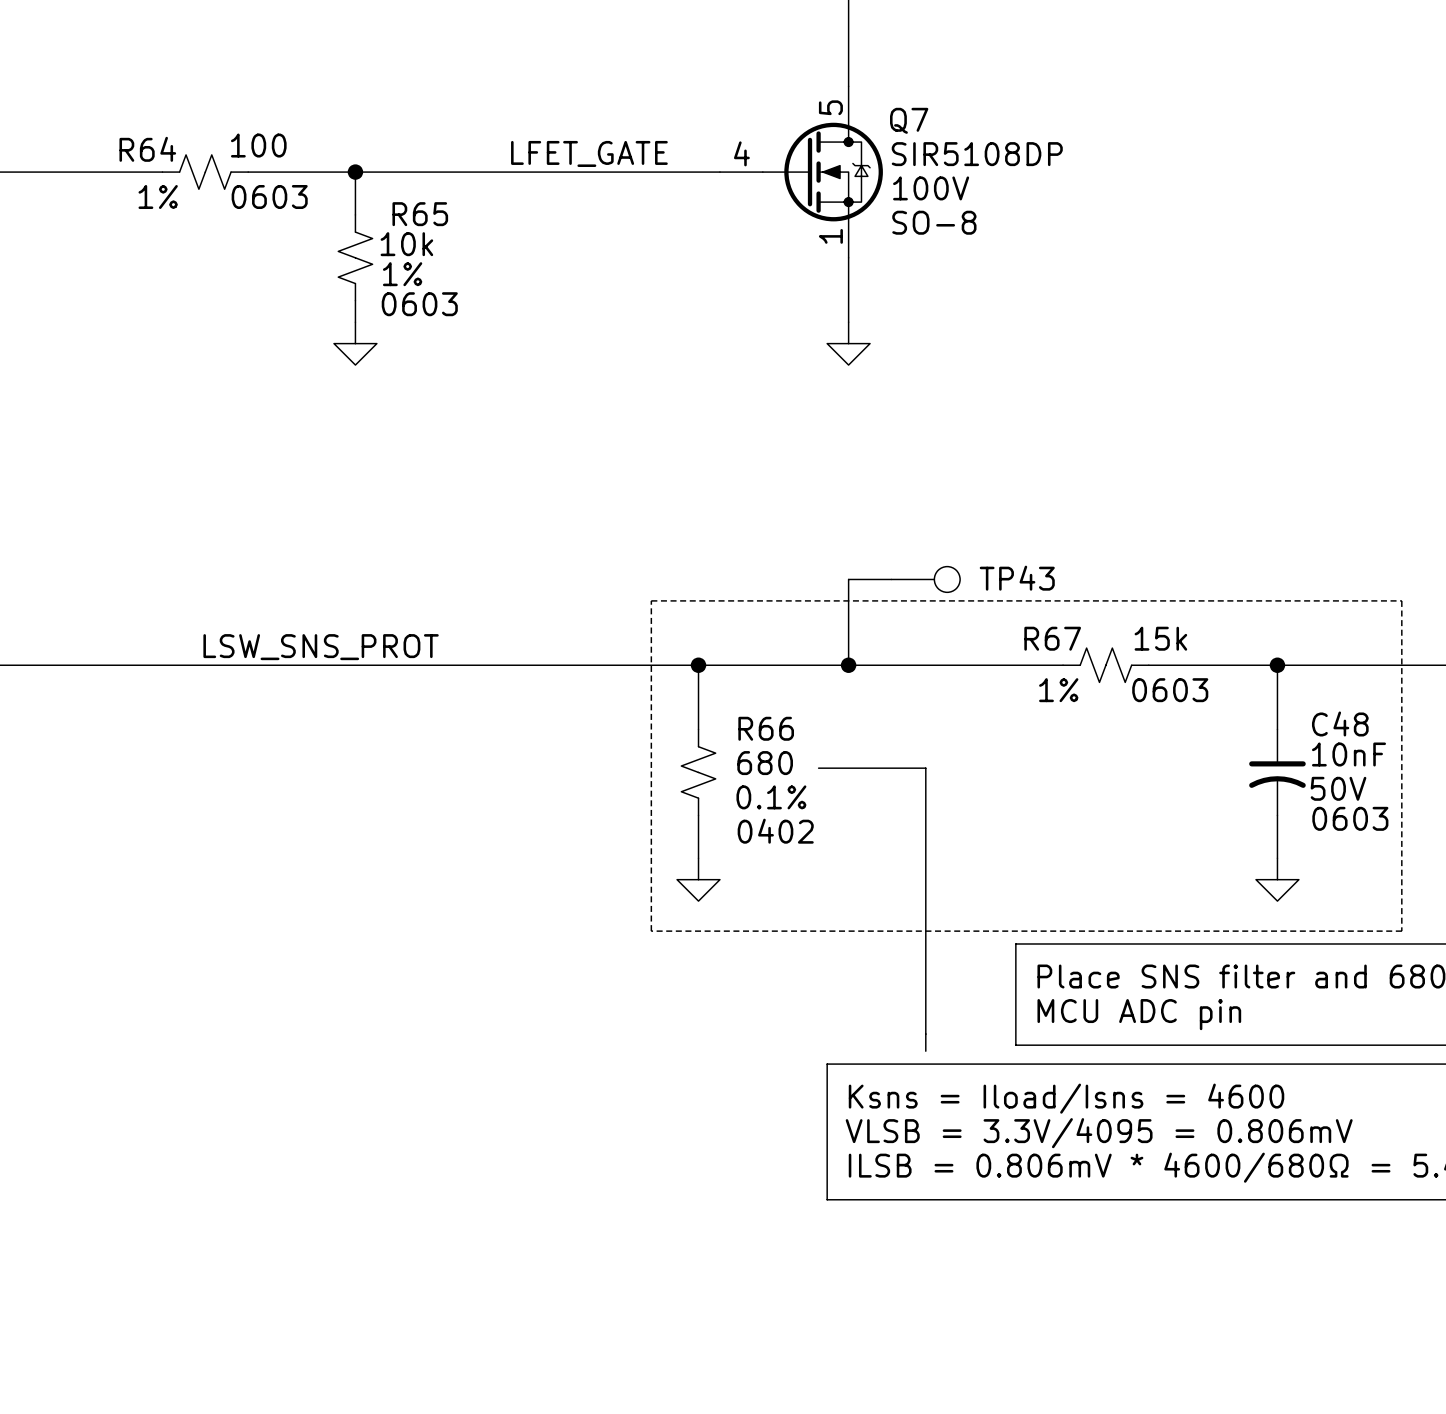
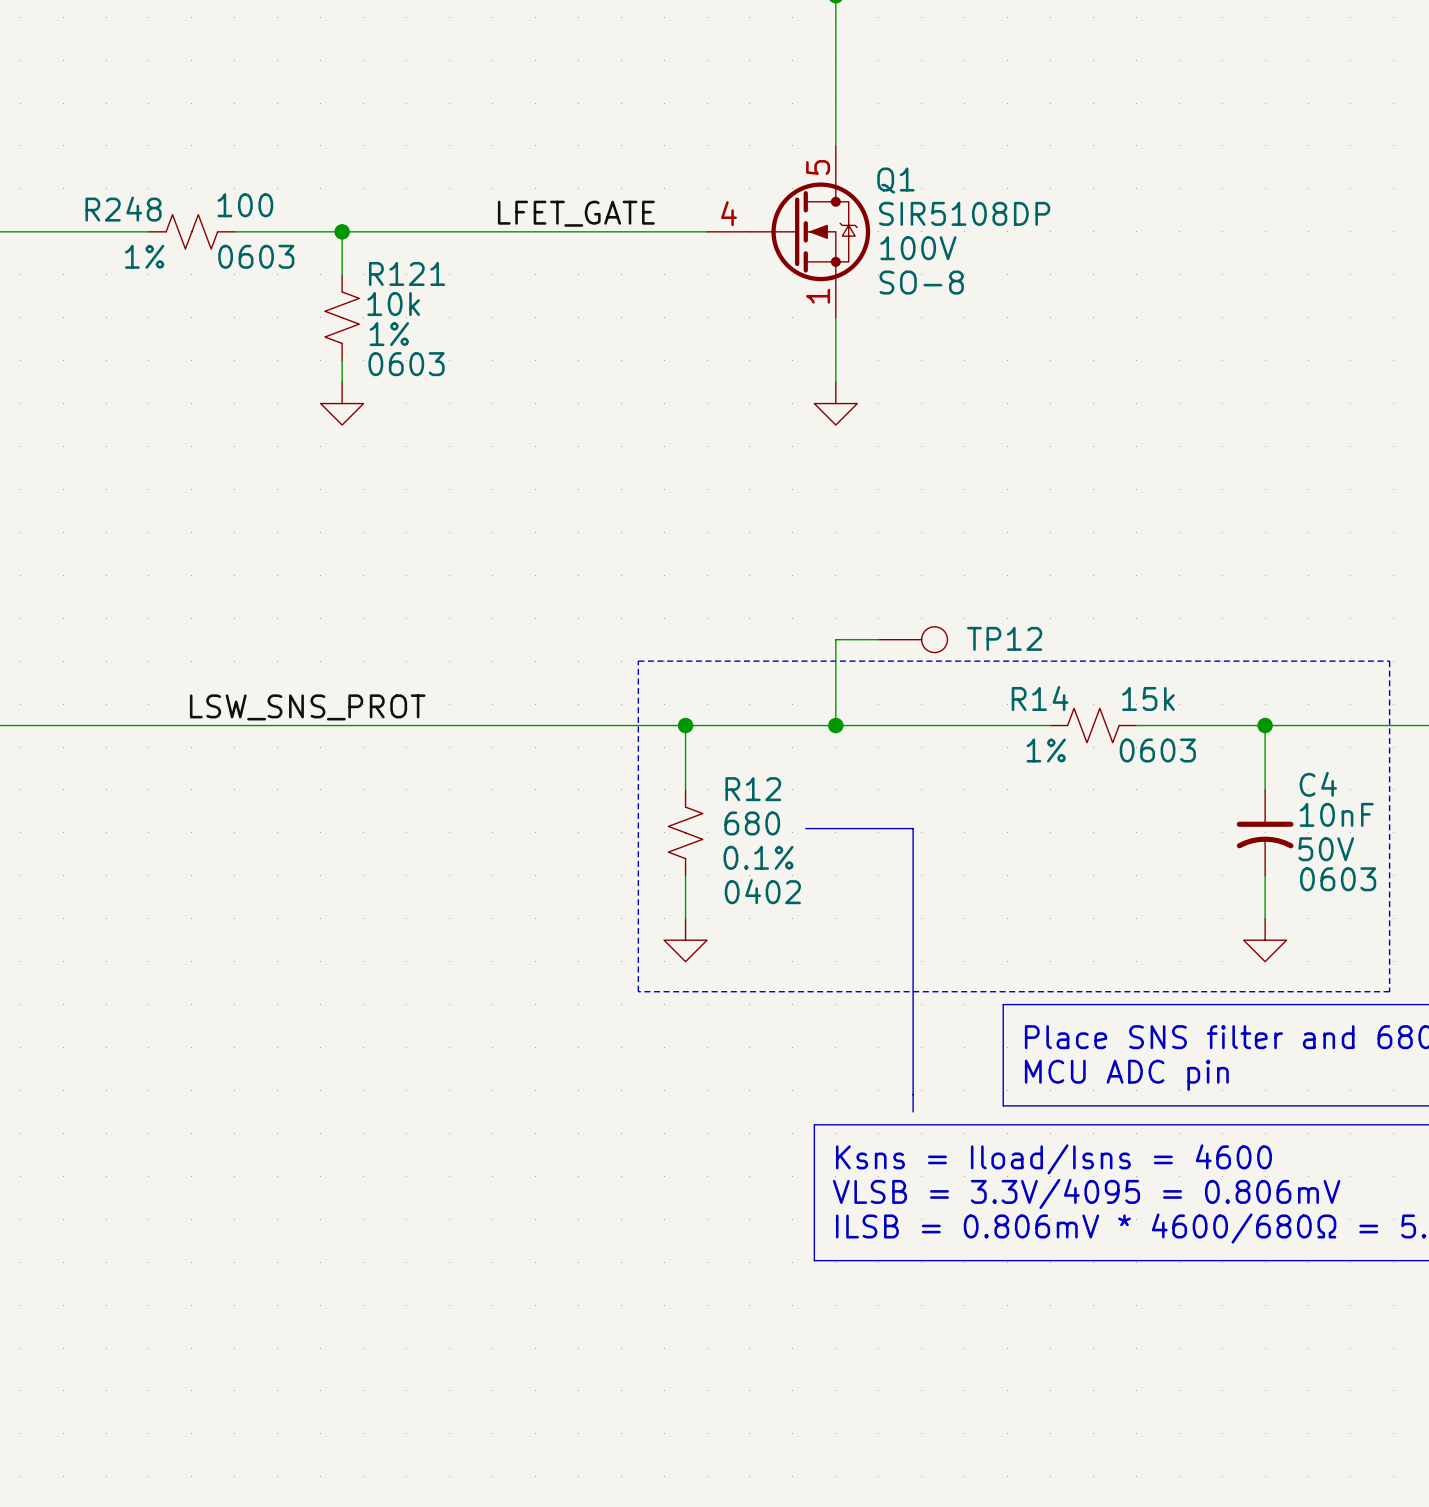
Q7 name: Q7 (909, 120) -> Q1 (895, 180)
R64 name: R64 (147, 149) -> R248 (123, 209)
R65 name: R65 (420, 214) -> R121 (407, 273)
TP43 name: TP43 (1017, 578) -> TP12 (1004, 638)
R67 name: R67 (1052, 638) -> R14 (1040, 698)
C48 name: C48 (1340, 723) -> C4 (1318, 784)
R66 name: R66 (766, 728) -> R12 (753, 789)

